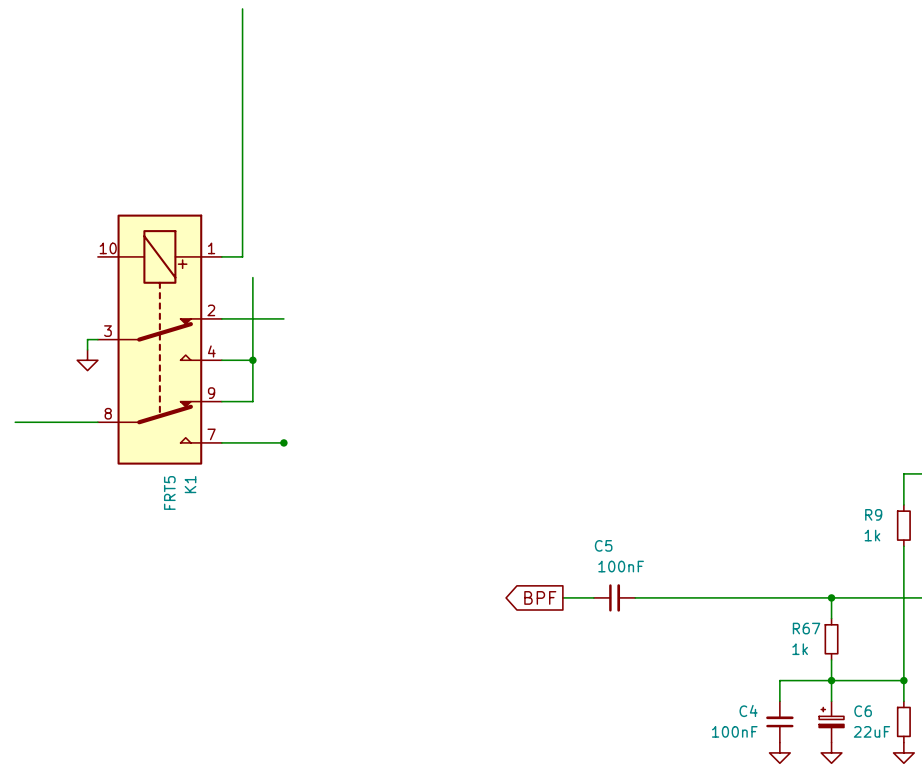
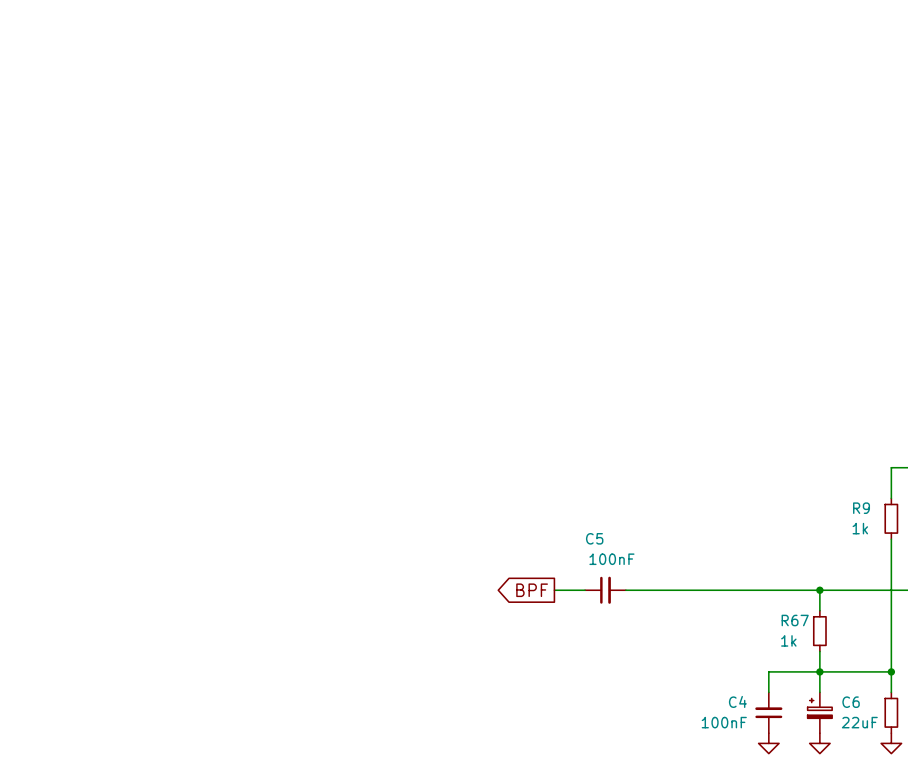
wire: (242, 8) (242, 256) (221, 256) -> none
wire: (252, 277) (252, 401) (221, 401) -> none
wire: (221, 318) (283, 318) -> none
wire: (97, 339) (87, 339) (87, 349) -> none
K1: FRT5 (159, 339) -> none
power symbol: (87, 360) -> none
wire: (221, 360) (252, 360) -> none
junction: (252, 360) -> none
wire: (15, 422) (97, 422) -> none
wire: (221, 442) (283, 442) -> none
junction: (283, 442) -> none

